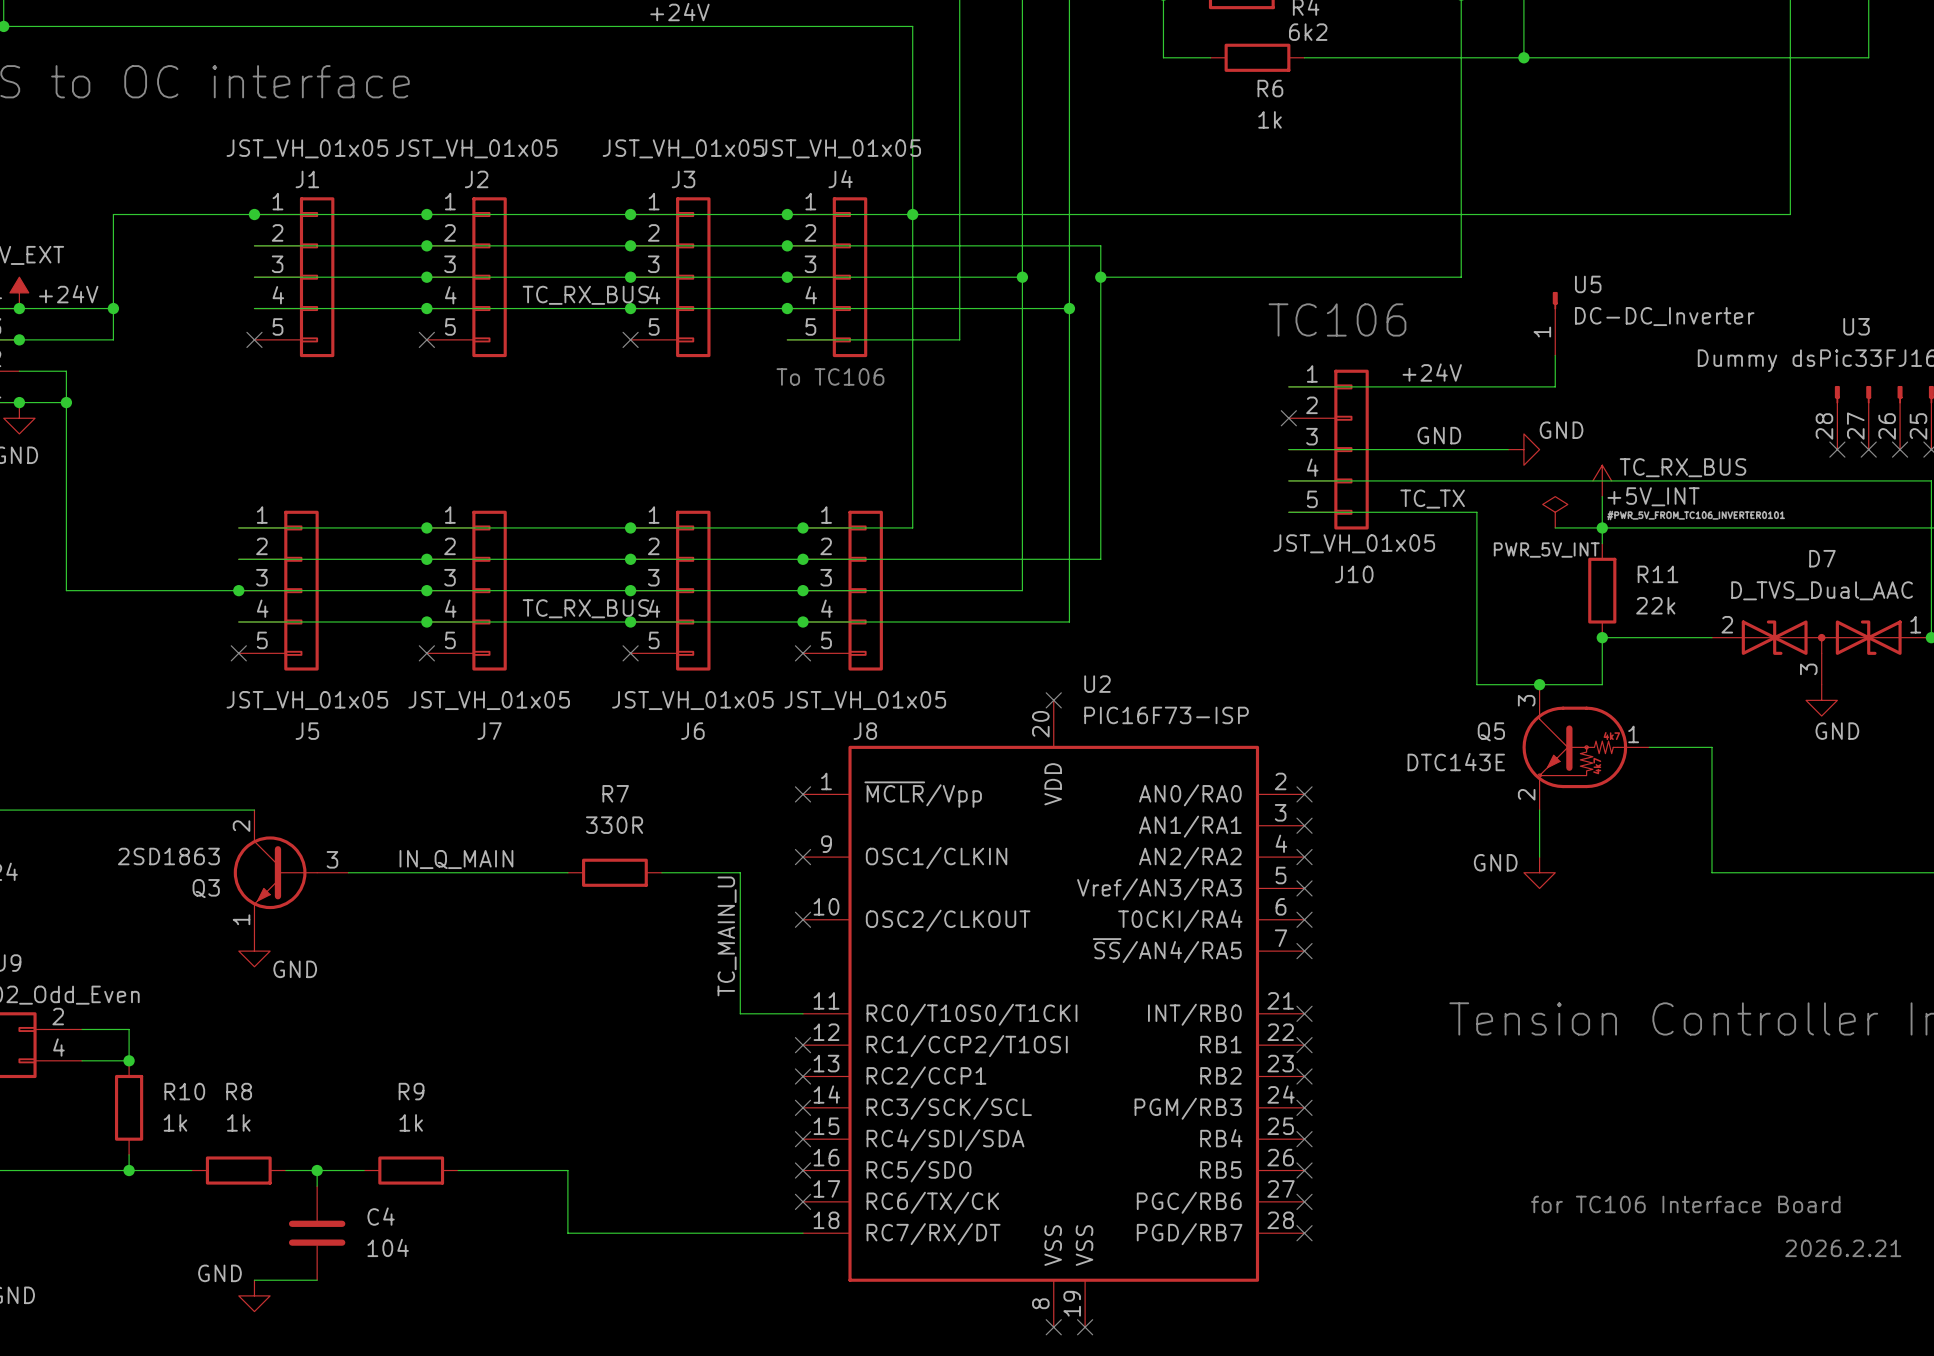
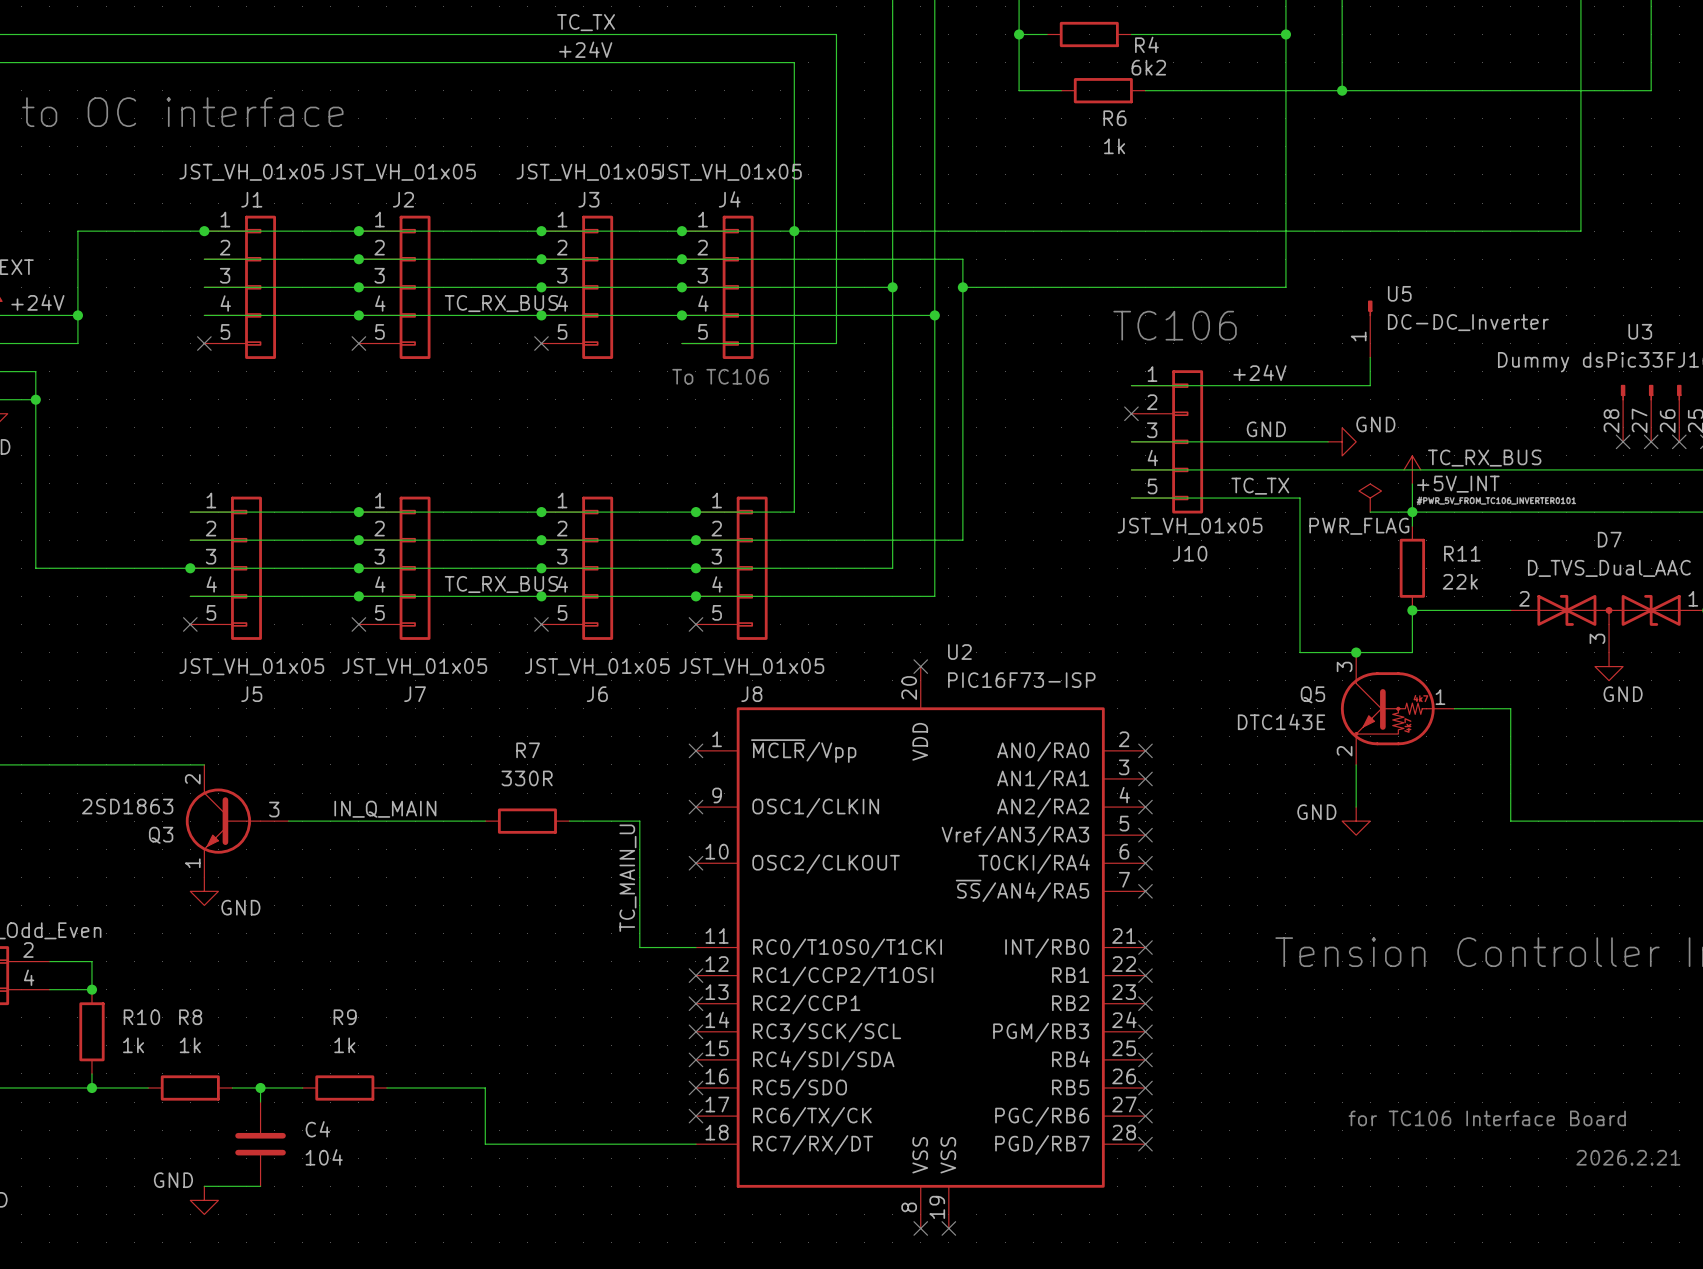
power symbol: PWR_5V_INT (1555, 512) -> PWR_FLAG (1370, 498)

